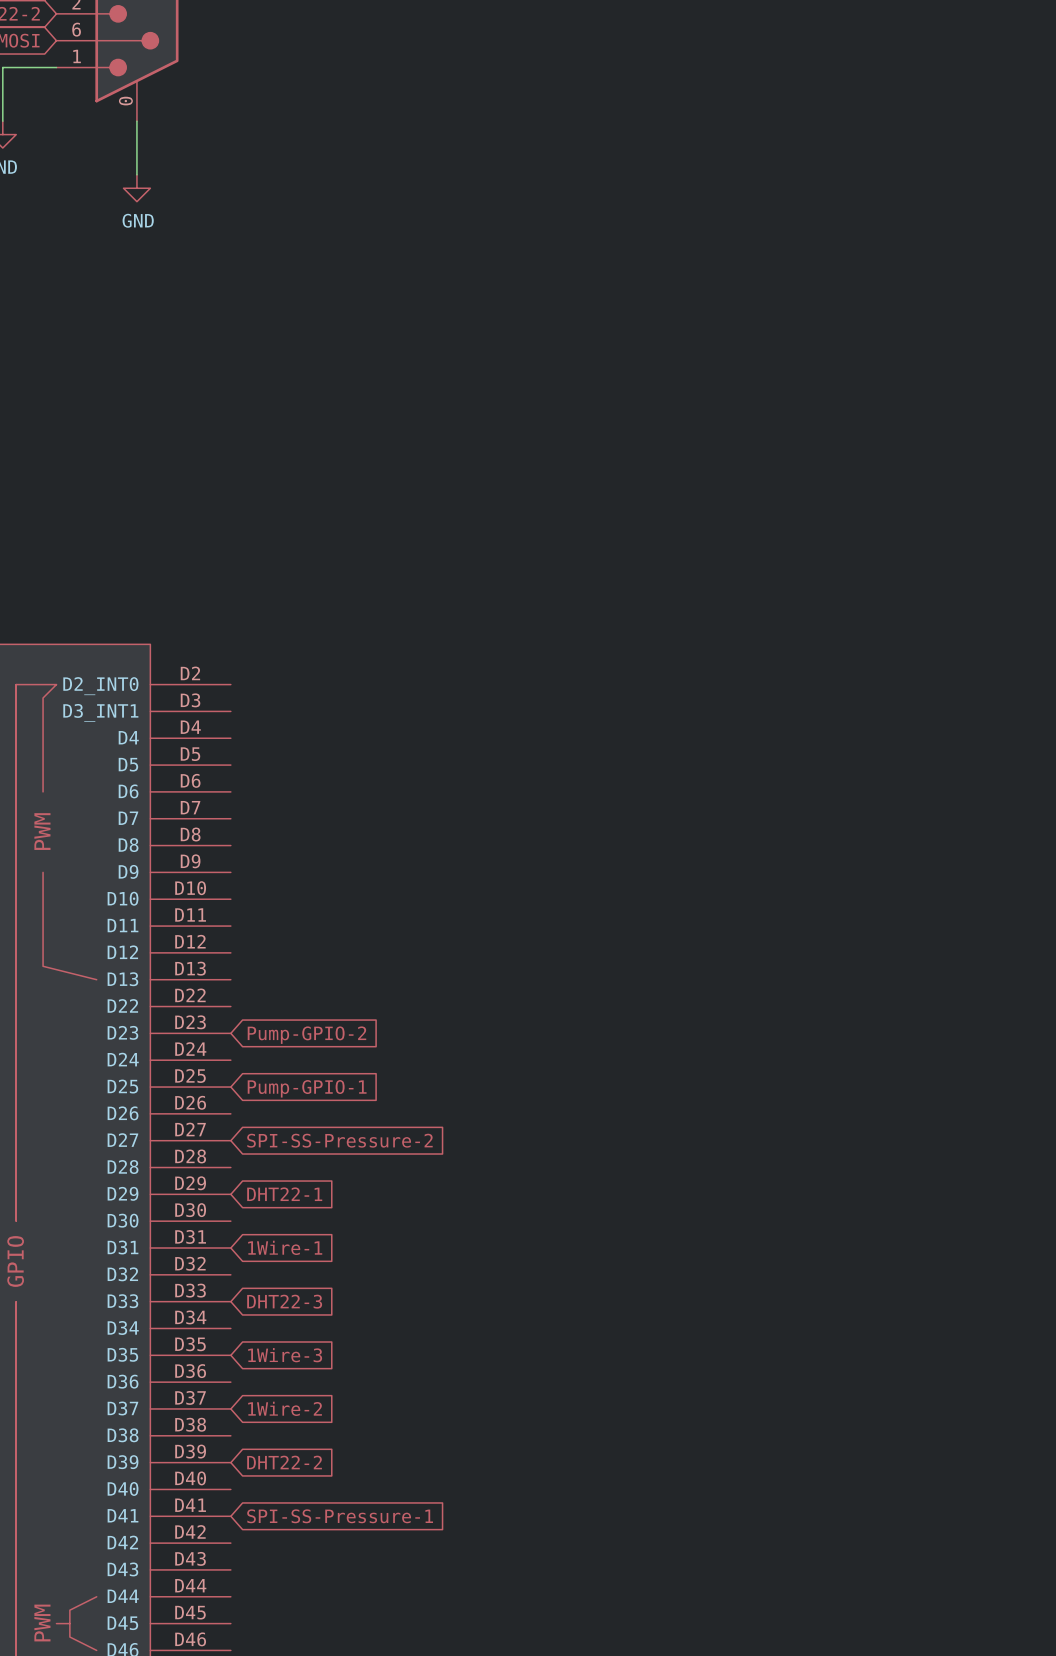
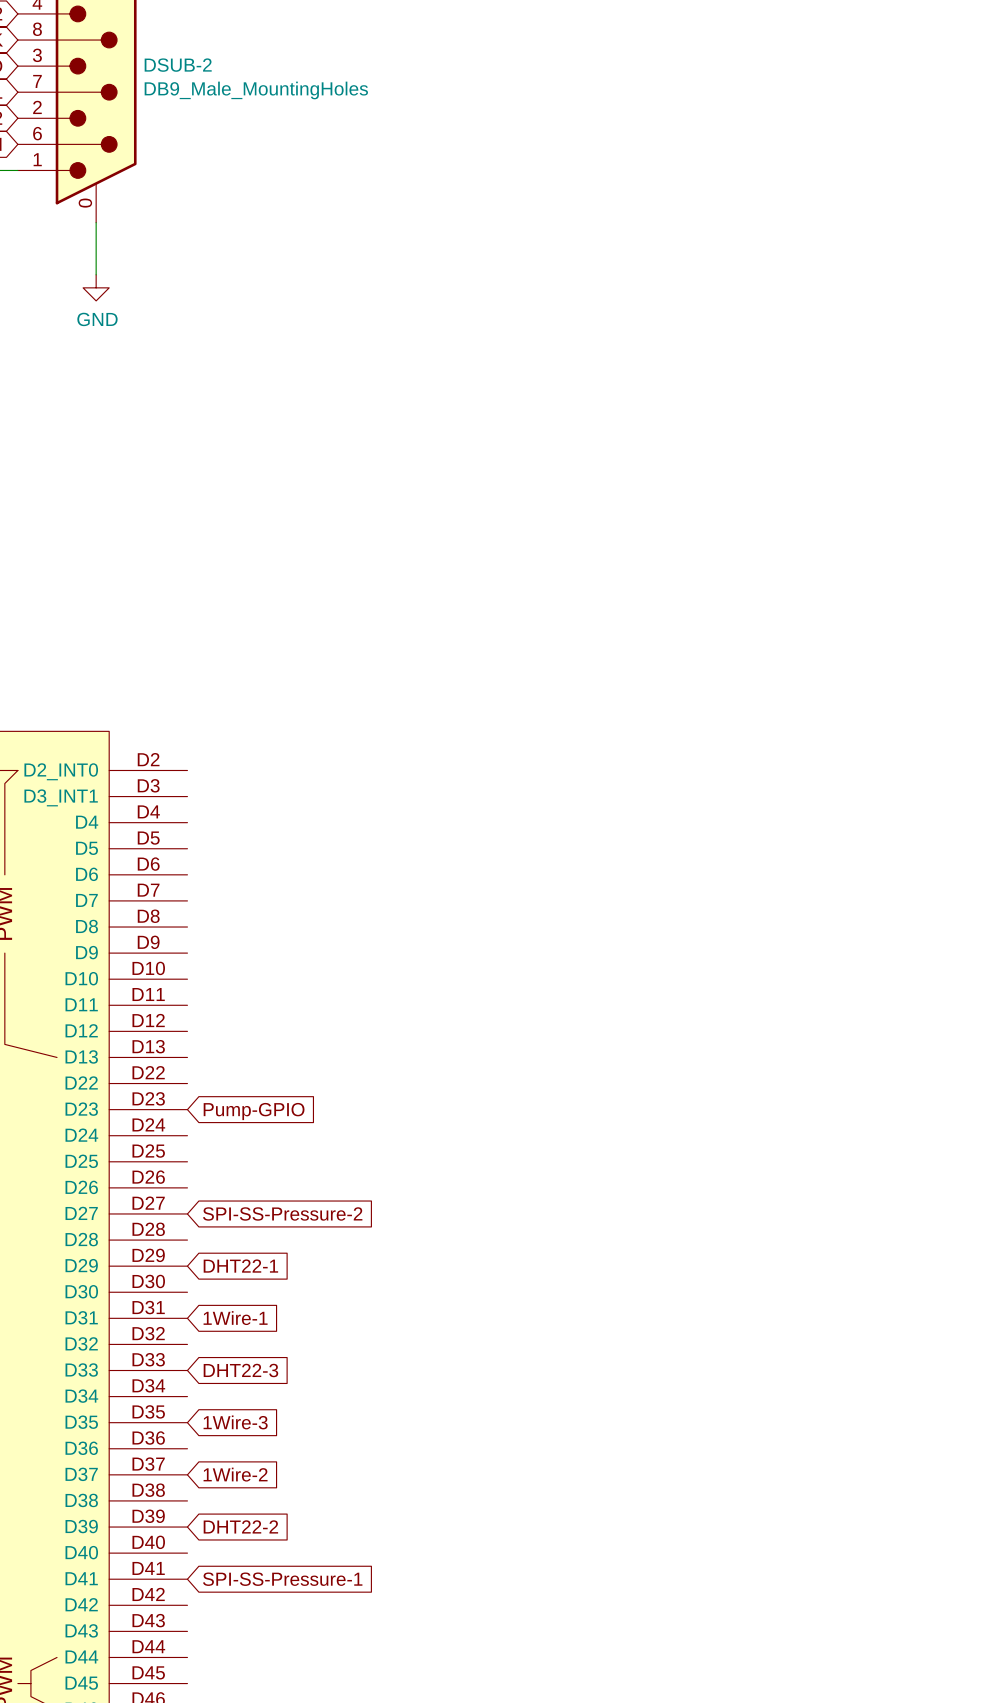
global label: Pump-GPIO-2 (306, 1035) -> Pump-GPIO (254, 1111)
global label: Pump-GPIO-1 (307, 1088) -> none

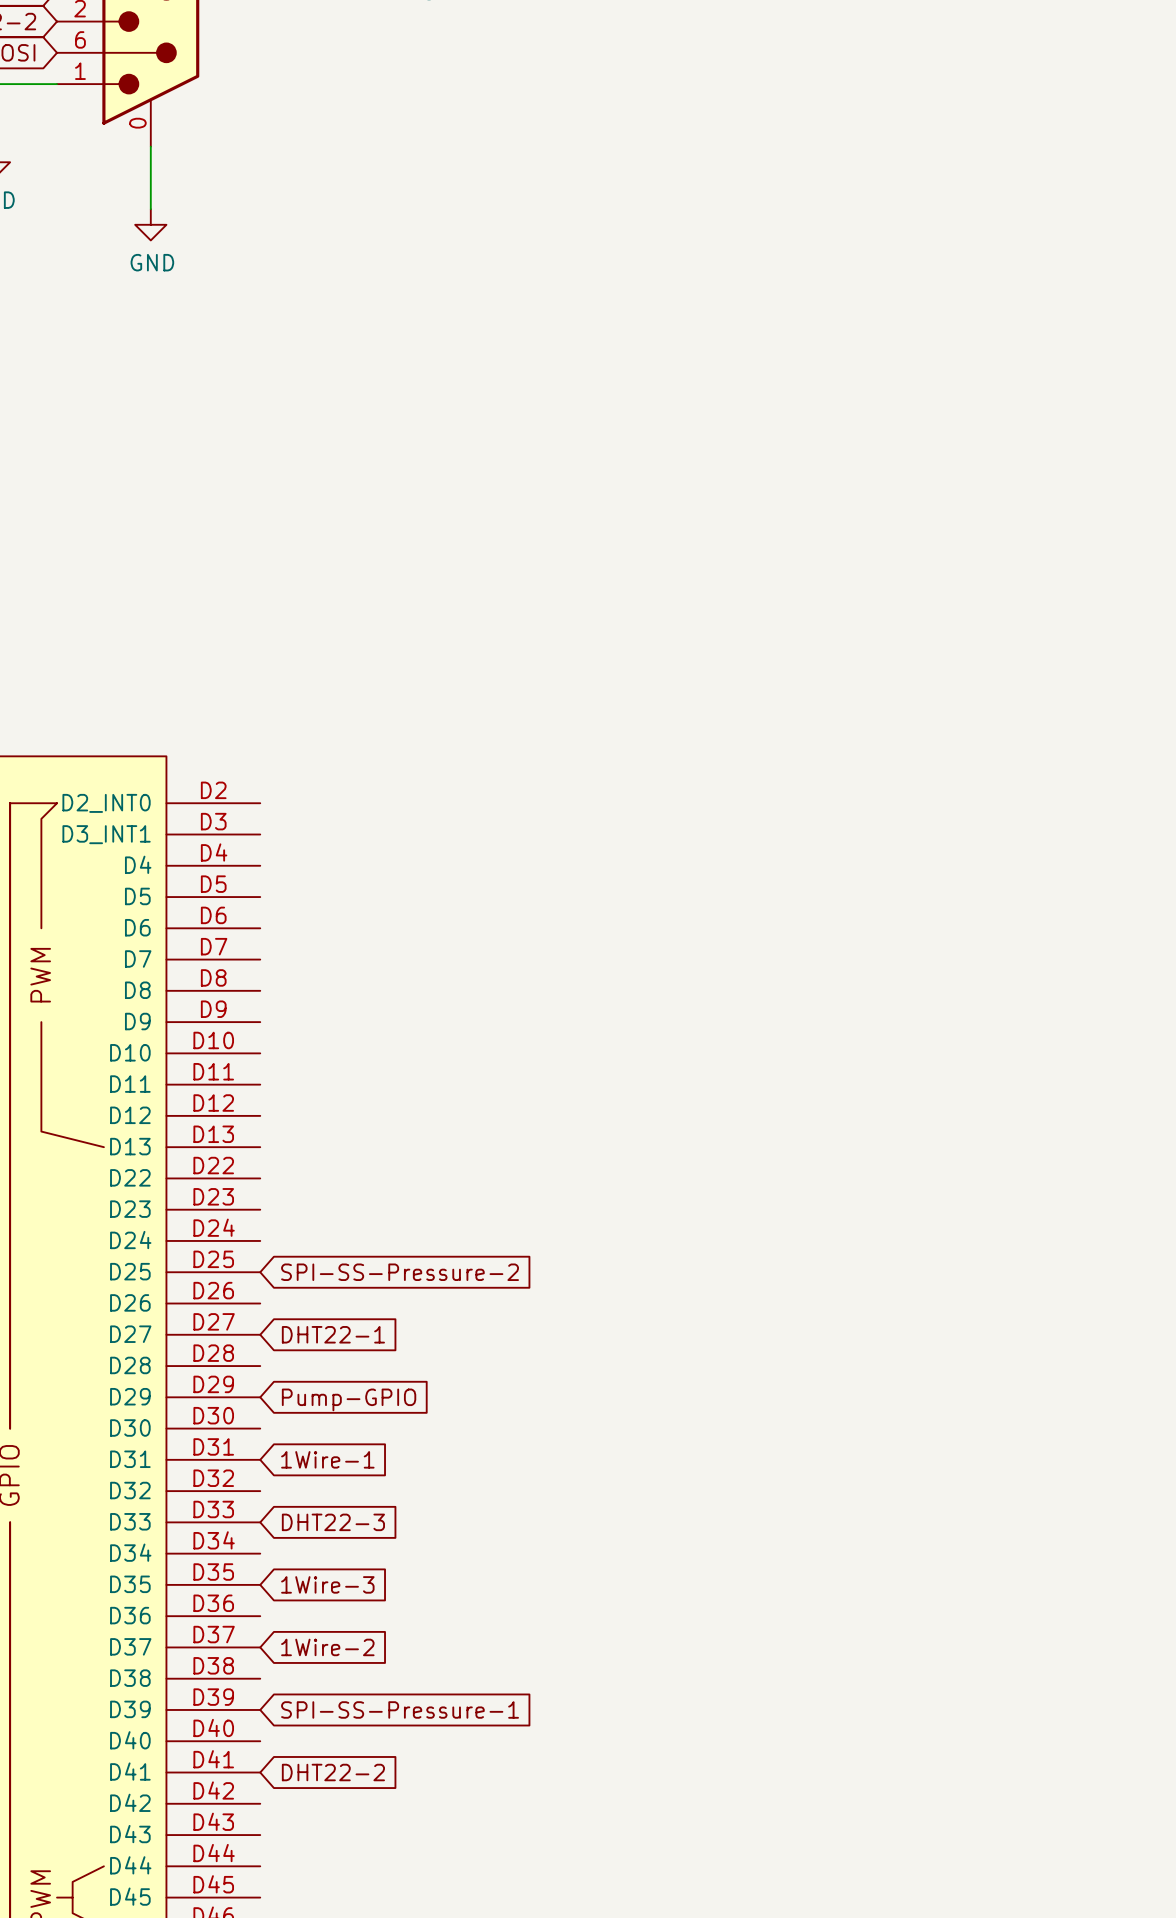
global label: Pump-GPIO (254, 1111) -> none
global label: none -> SPI-SS-Pressure-2 (400, 1272)
global label: SPI-SS-Pressure-2 (282, 1213) -> DHT22-1 (333, 1334)
global label: DHT22-1 (240, 1266) -> Pump-GPIO (349, 1399)
global label: DHT22-2 (240, 1526) -> SPI-SS-Pressure-1 (400, 1709)
global label: SPI-SS-Pressure-1 (282, 1579) -> DHT22-2 (333, 1772)

